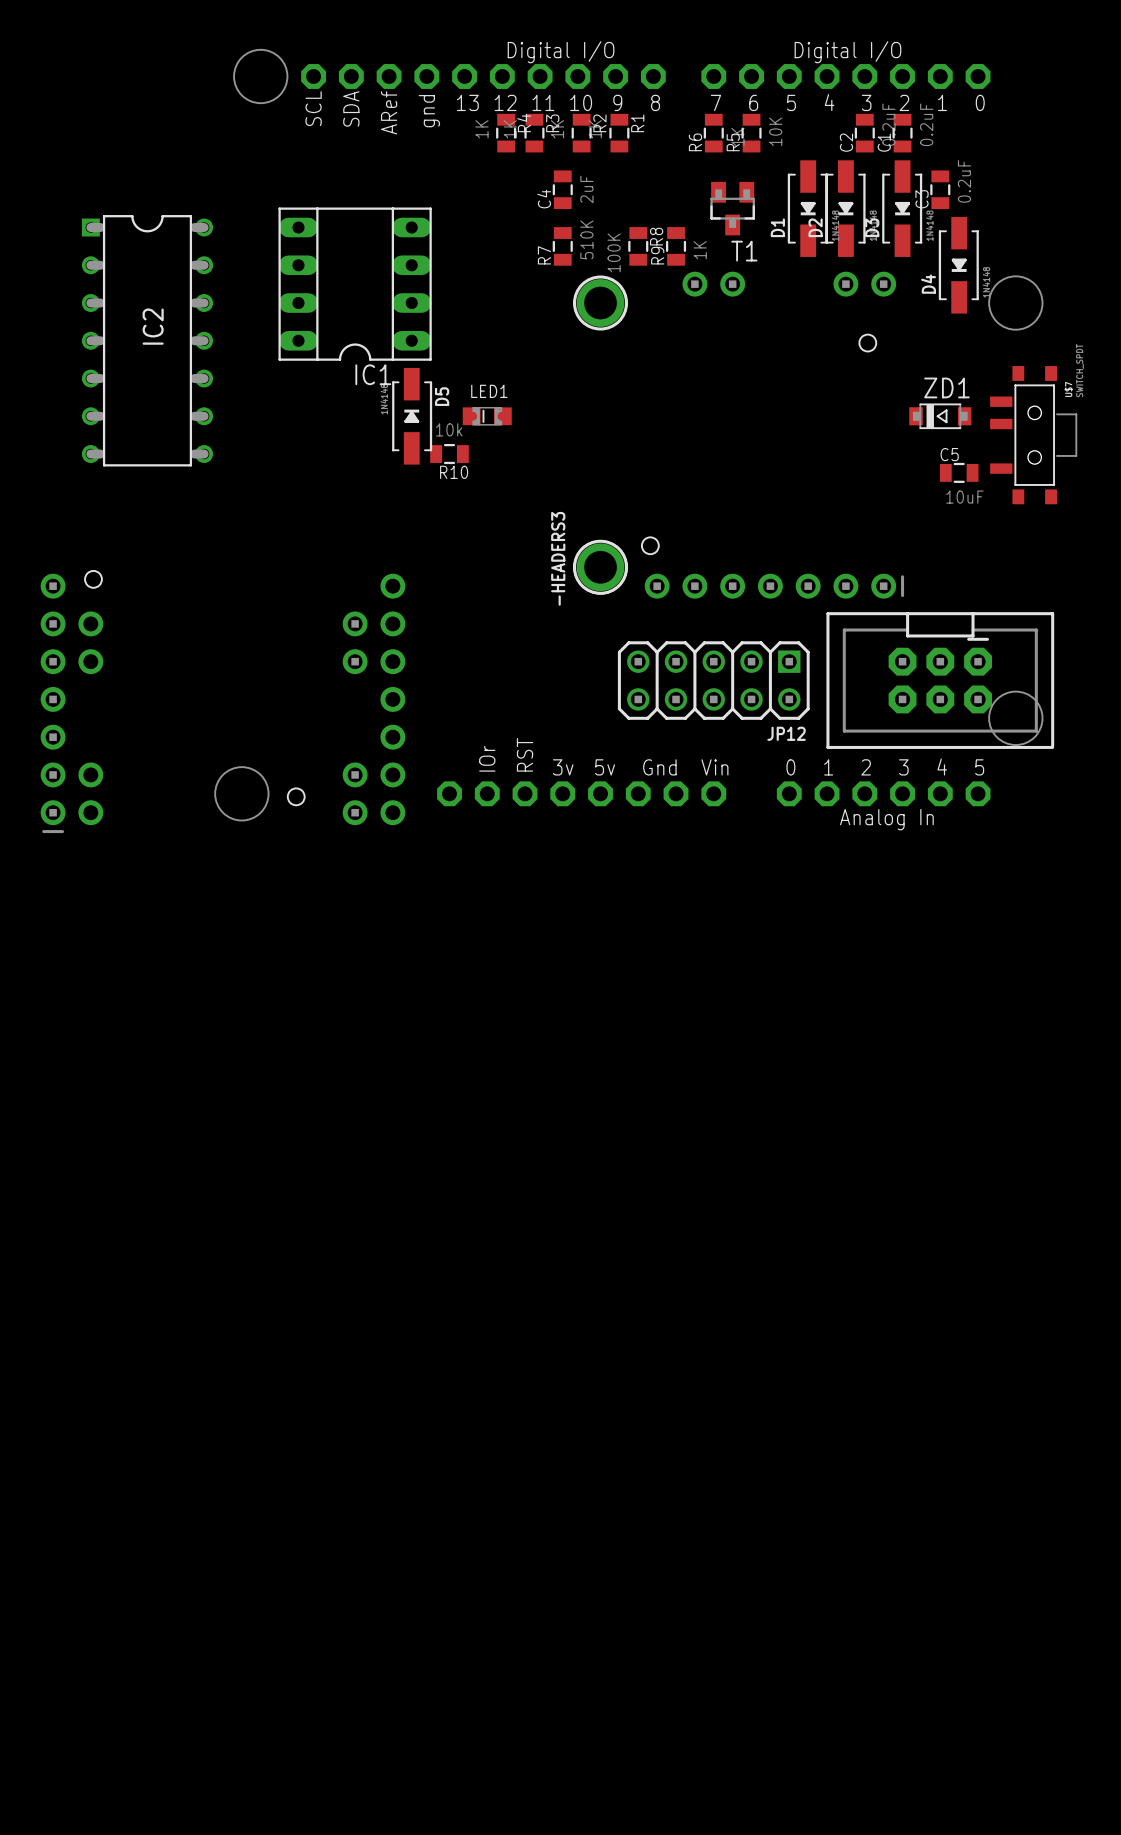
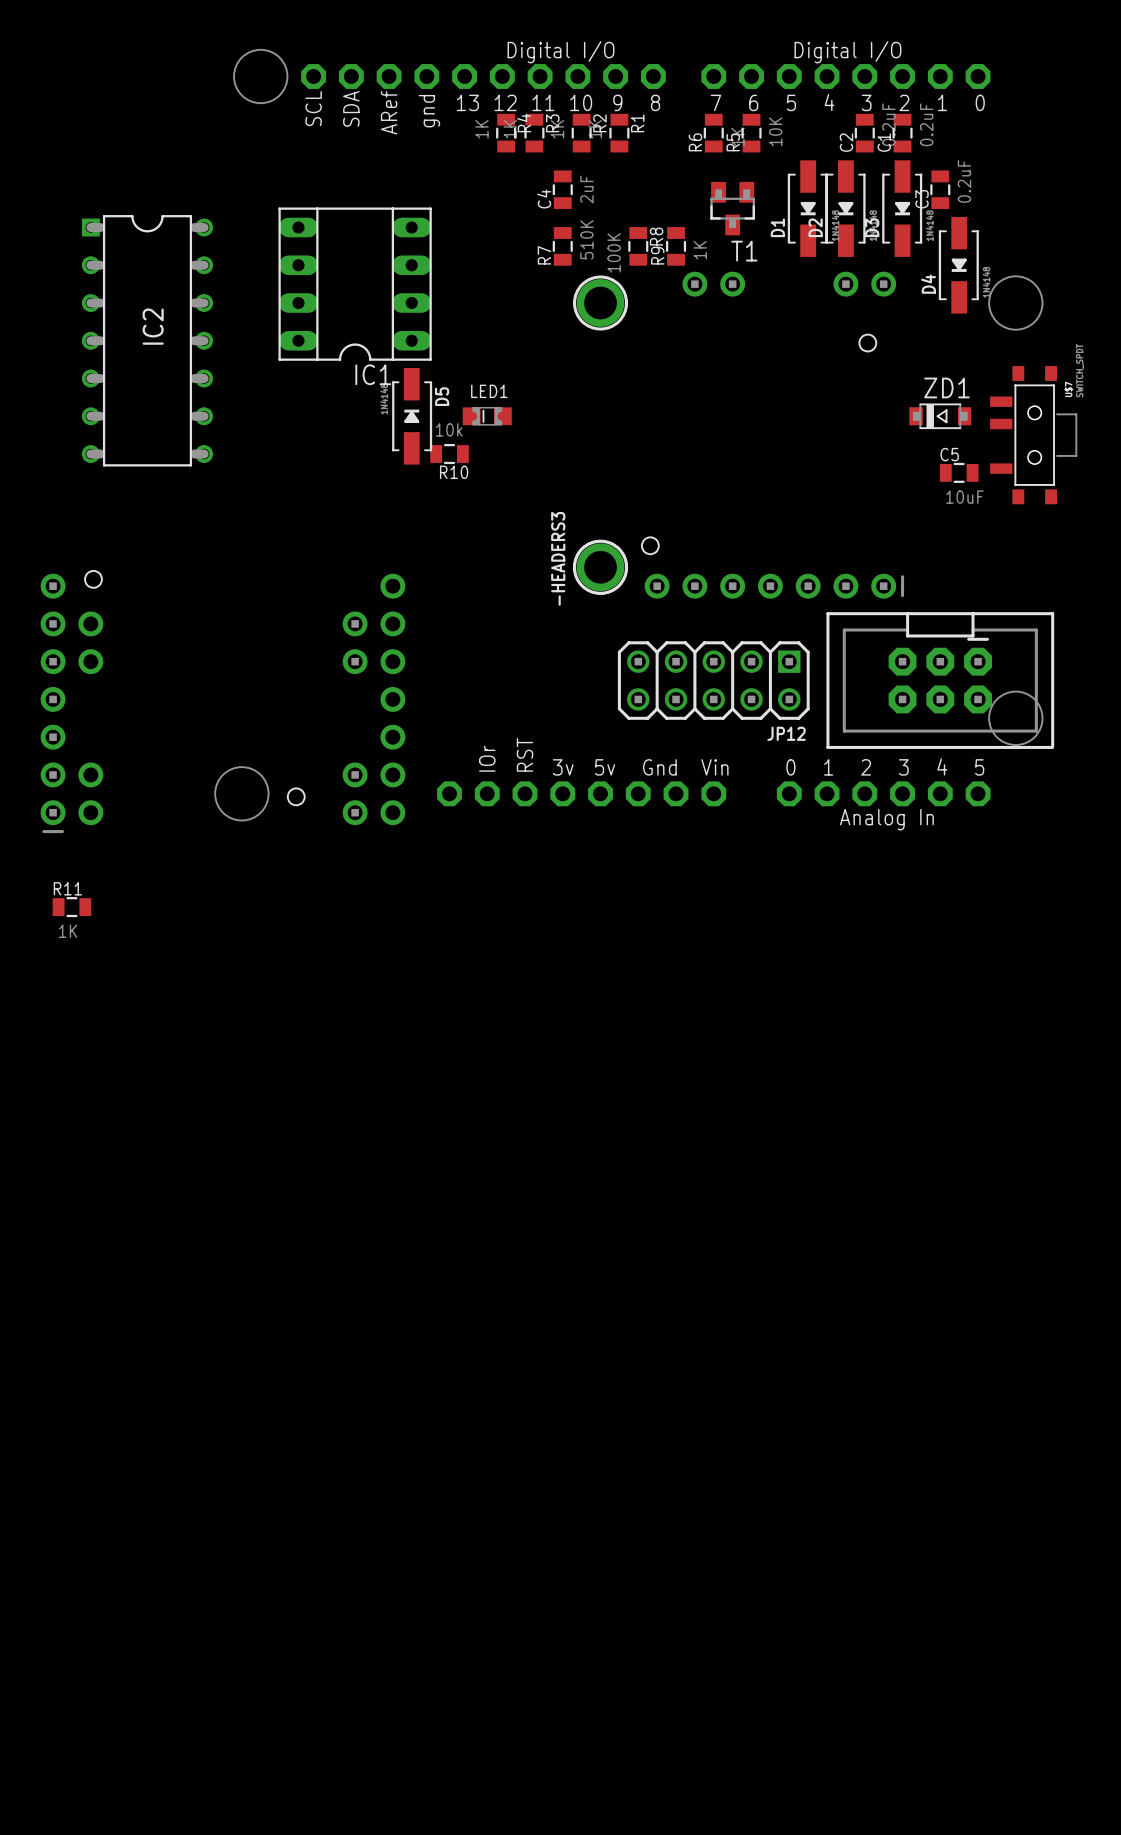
R11: none -> 1K (71, 907)

